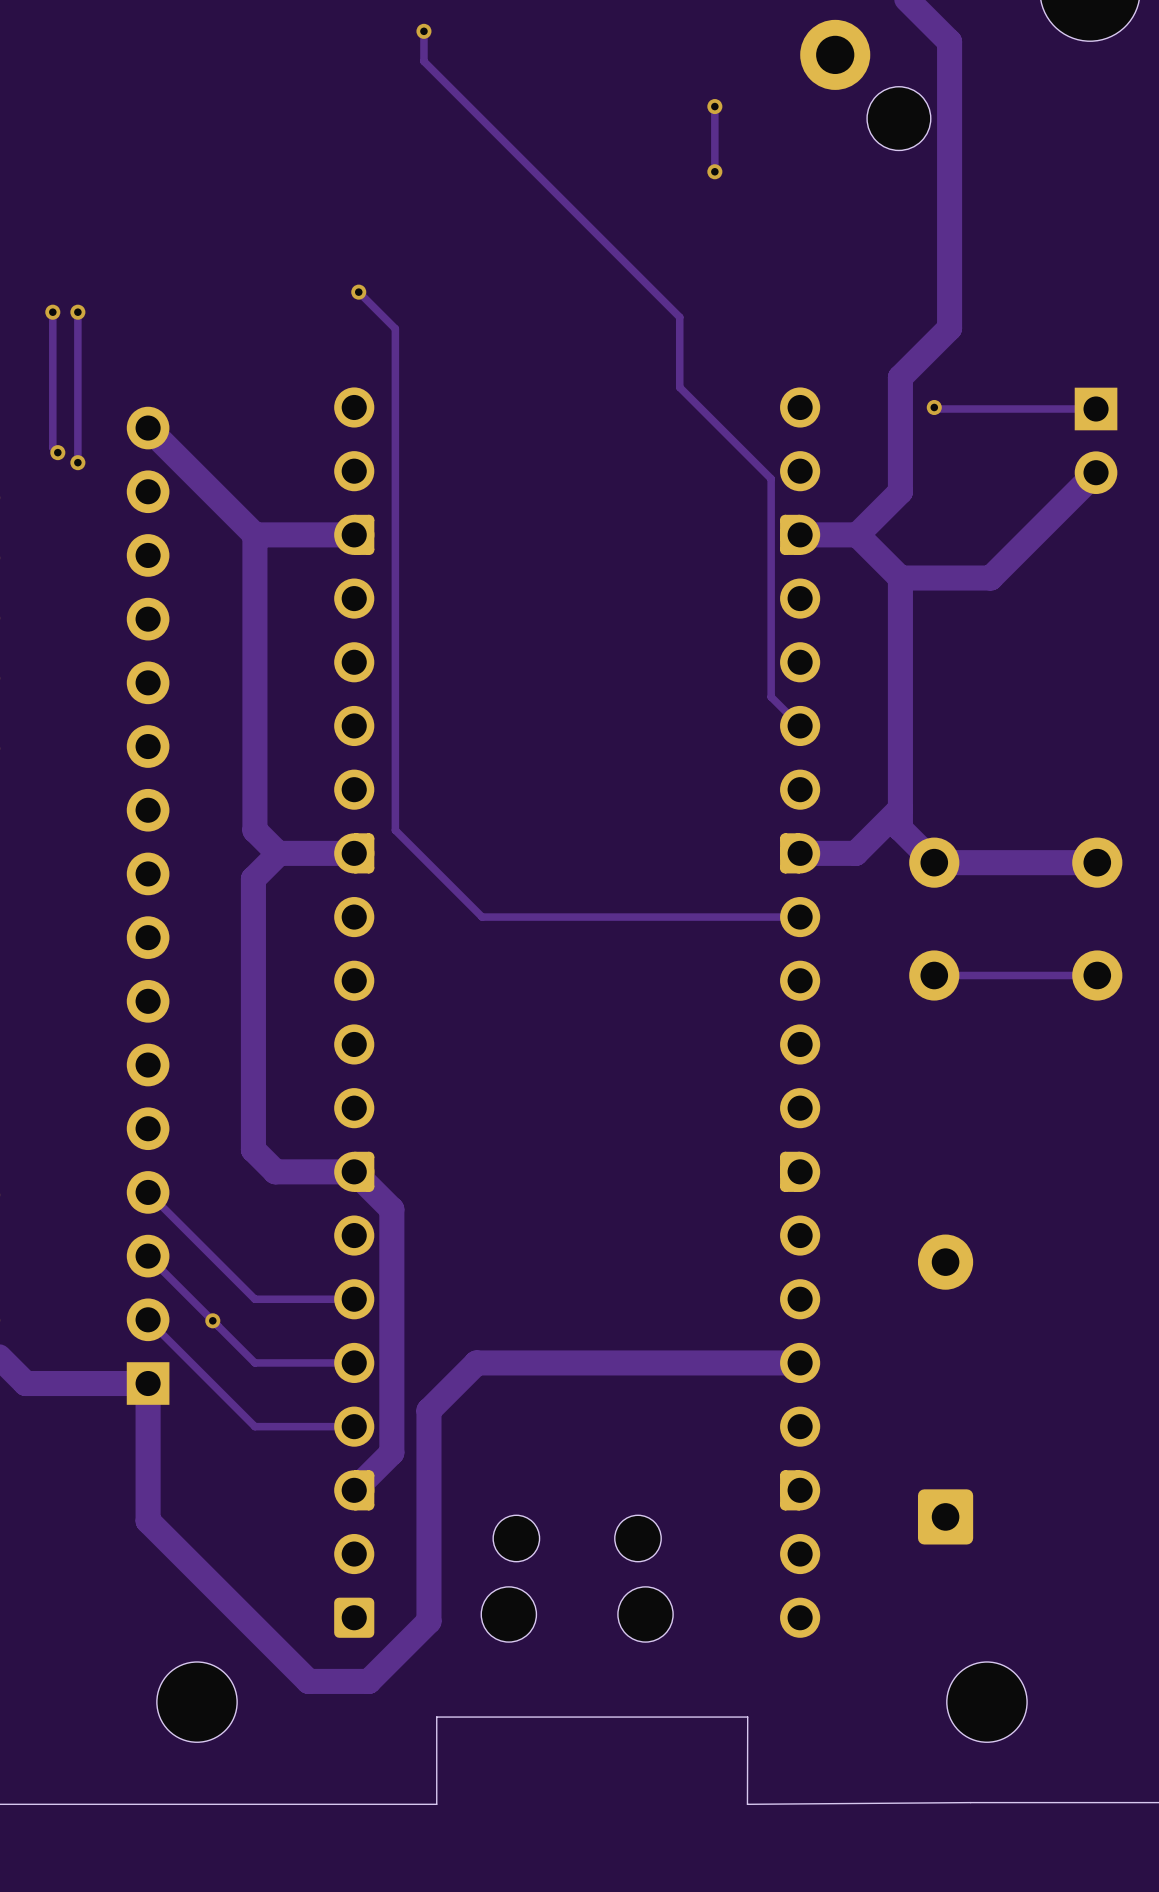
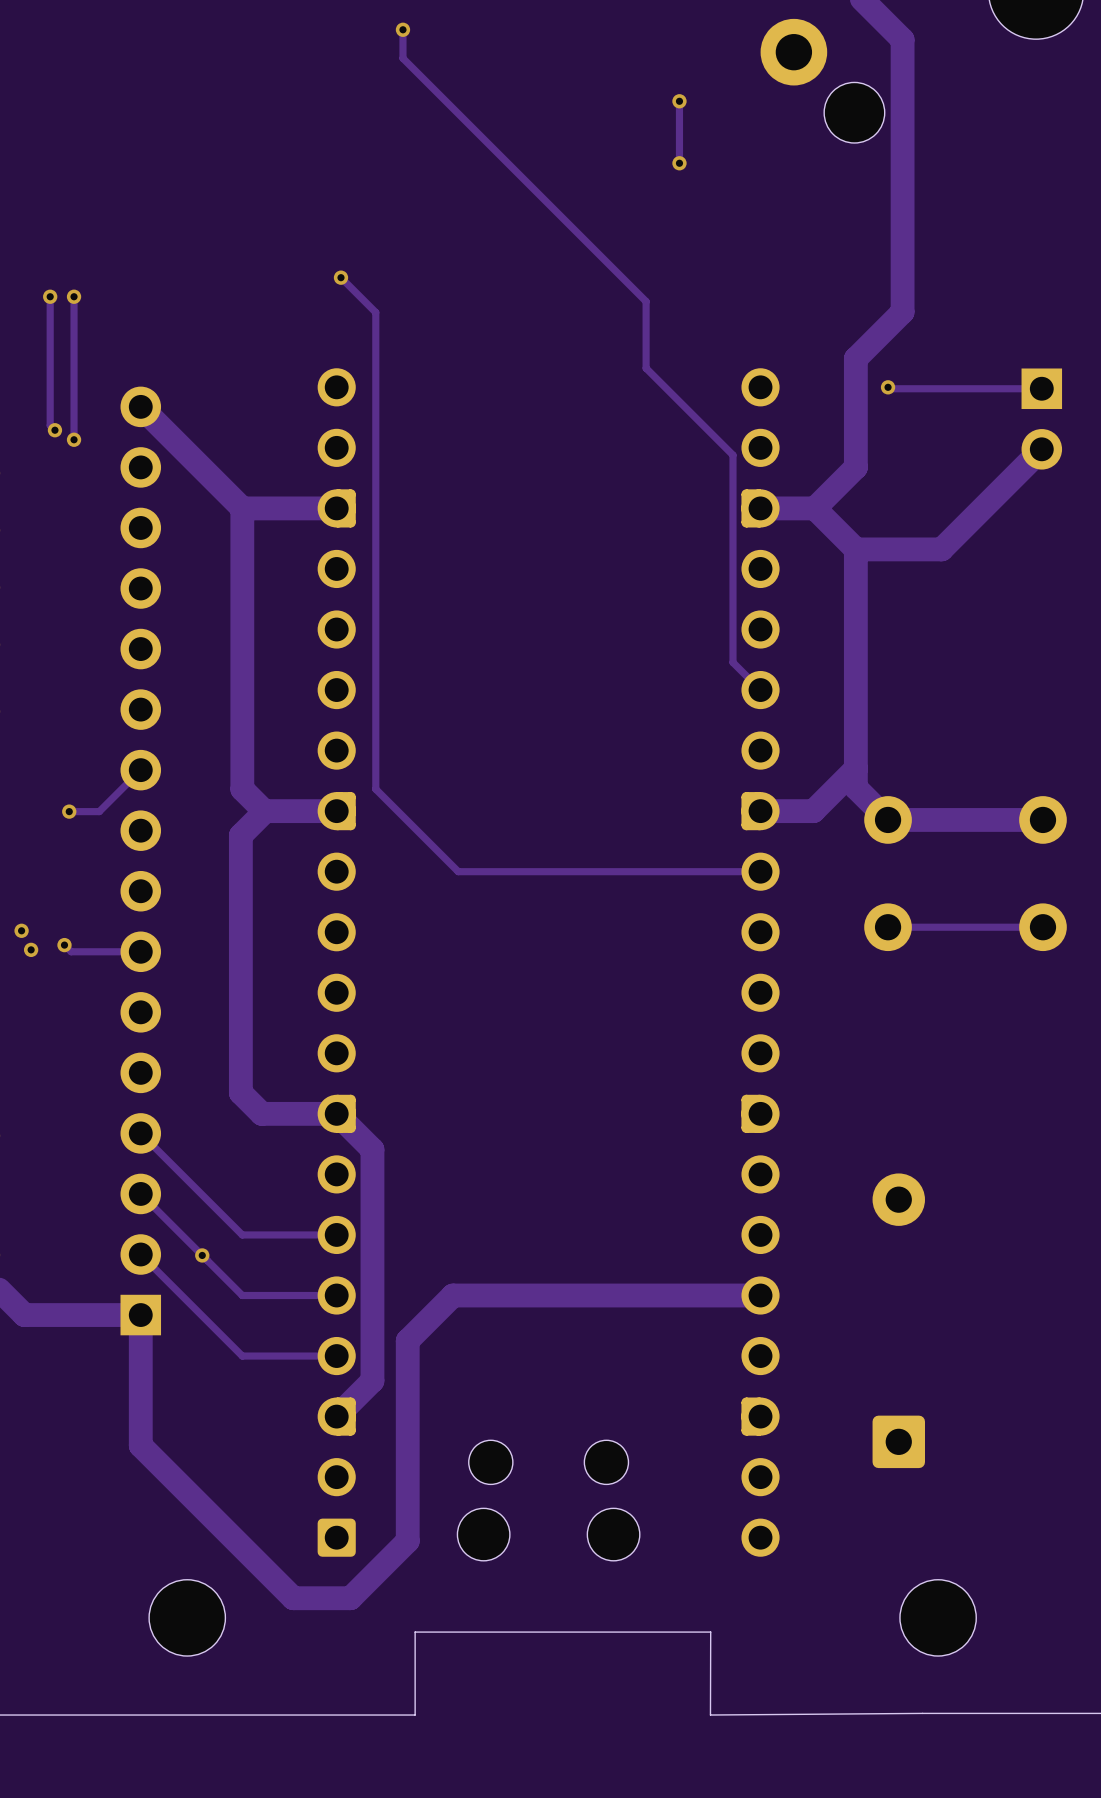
track: none -> (140, 770) (99, 811) (69, 811)
via: none -> (69, 811)
via: none -> (21, 930)
track: none -> (64, 945) (71, 951) (140, 951)
via: none -> (64, 945)
via: none -> (31, 949)

